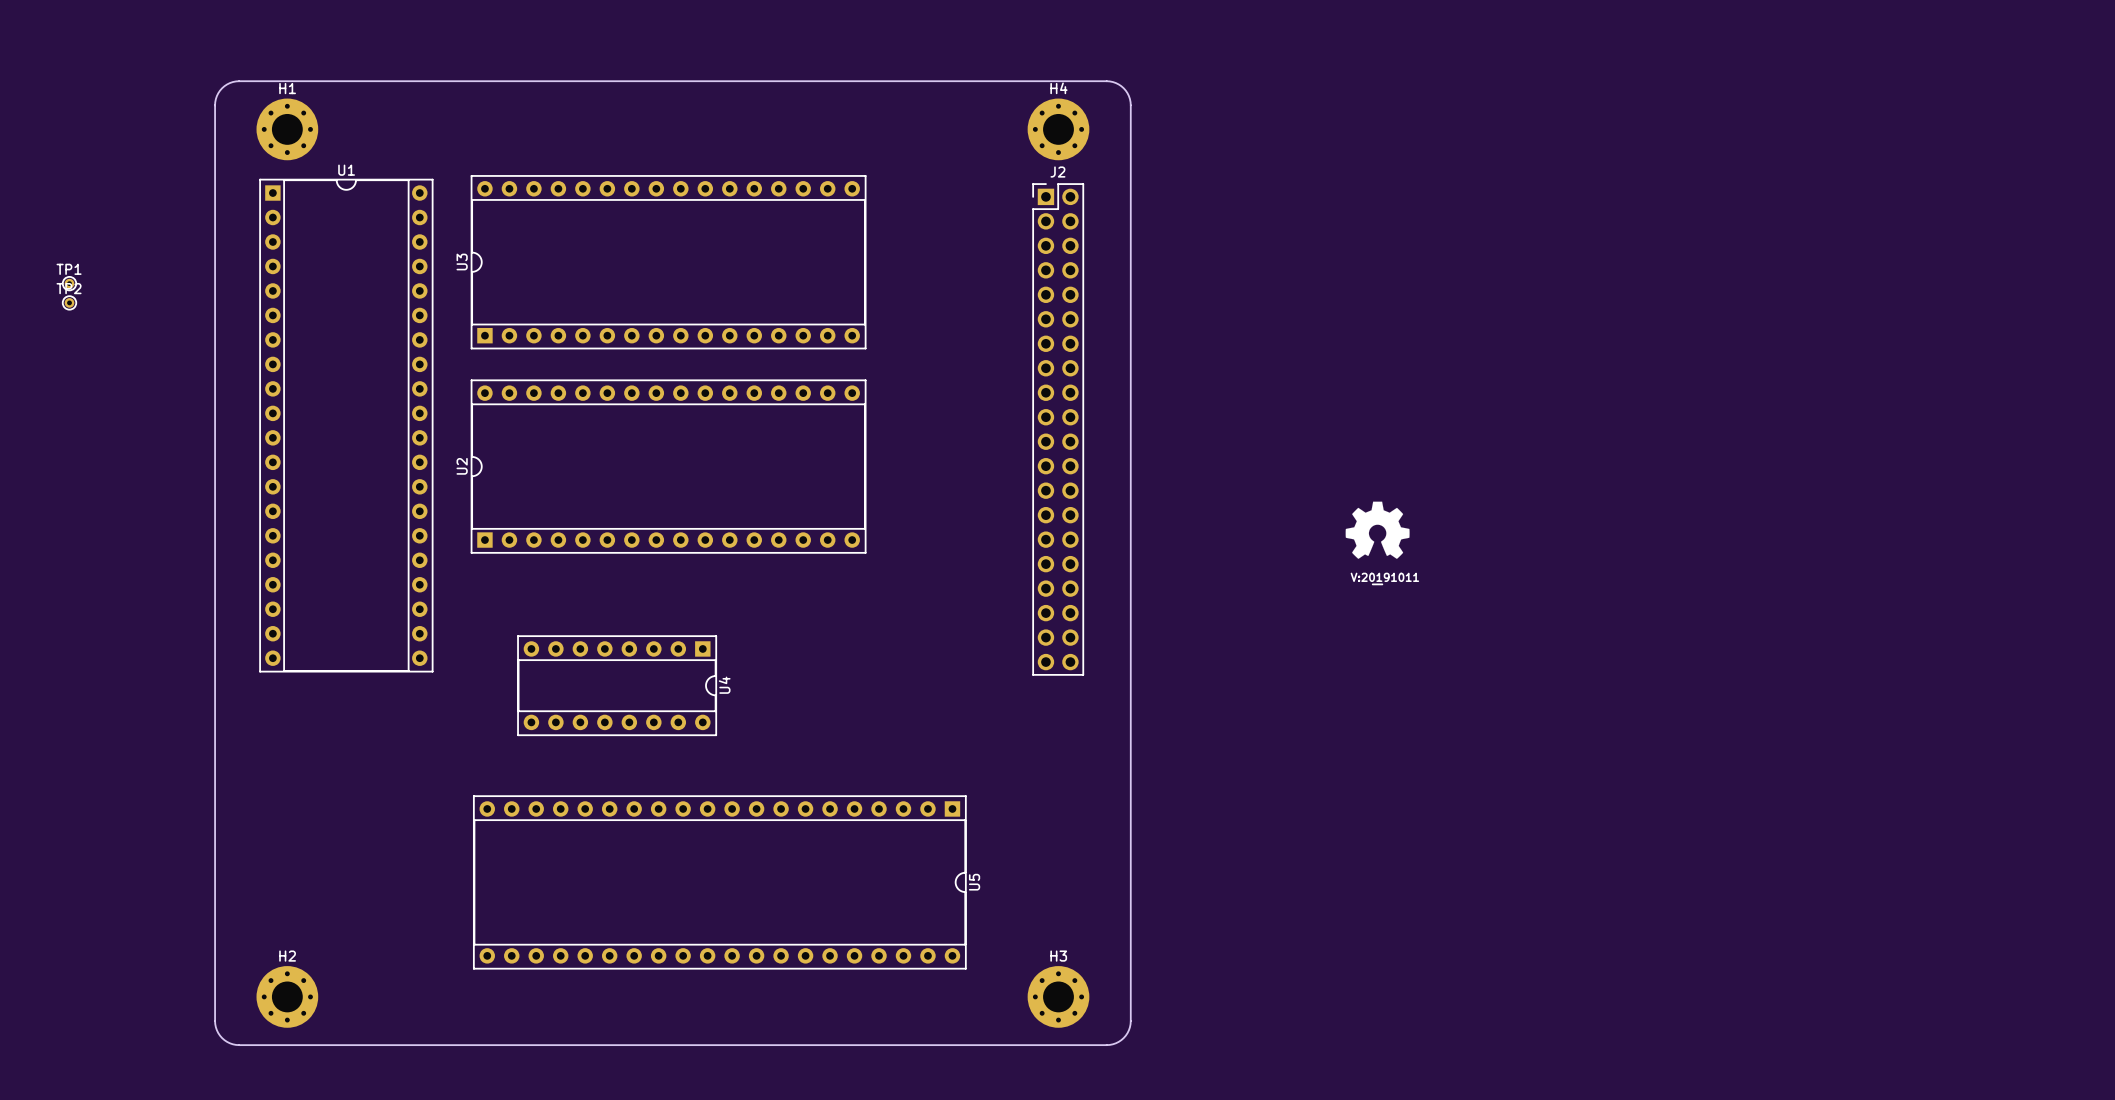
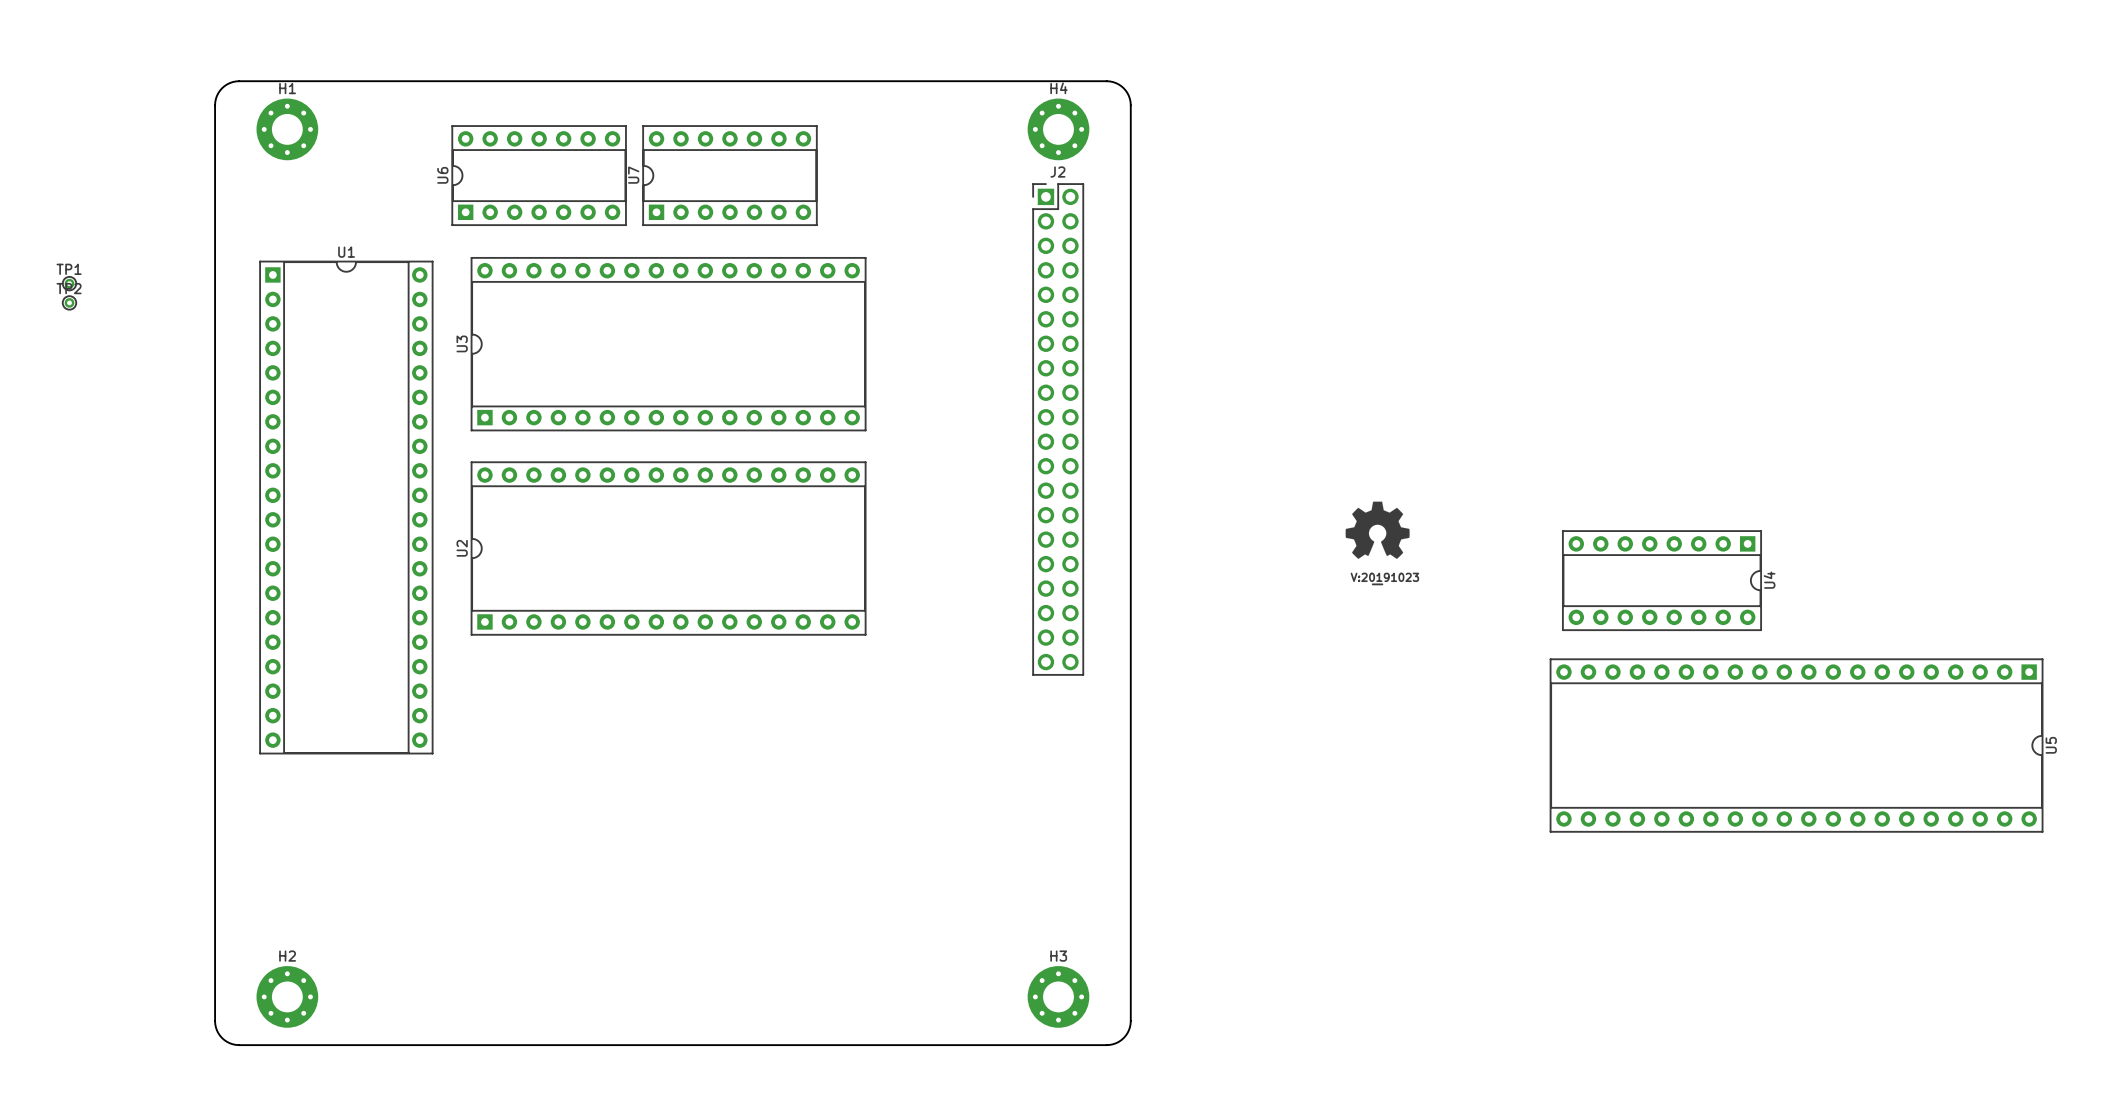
U6: none -> (539, 175)
U7: none -> (729, 175)
U3 position: (668, 262) -> (668, 344)
U1 position: (346, 425) -> (346, 507)
U2 position: (668, 466) -> (668, 548)
drawing shape: [1350, 572, 1420, 586] -> [1350, 572, 1420, 586]
U4 position: (617, 685) -> (1661, 580)
U5 position: (719, 882) -> (1796, 745)

